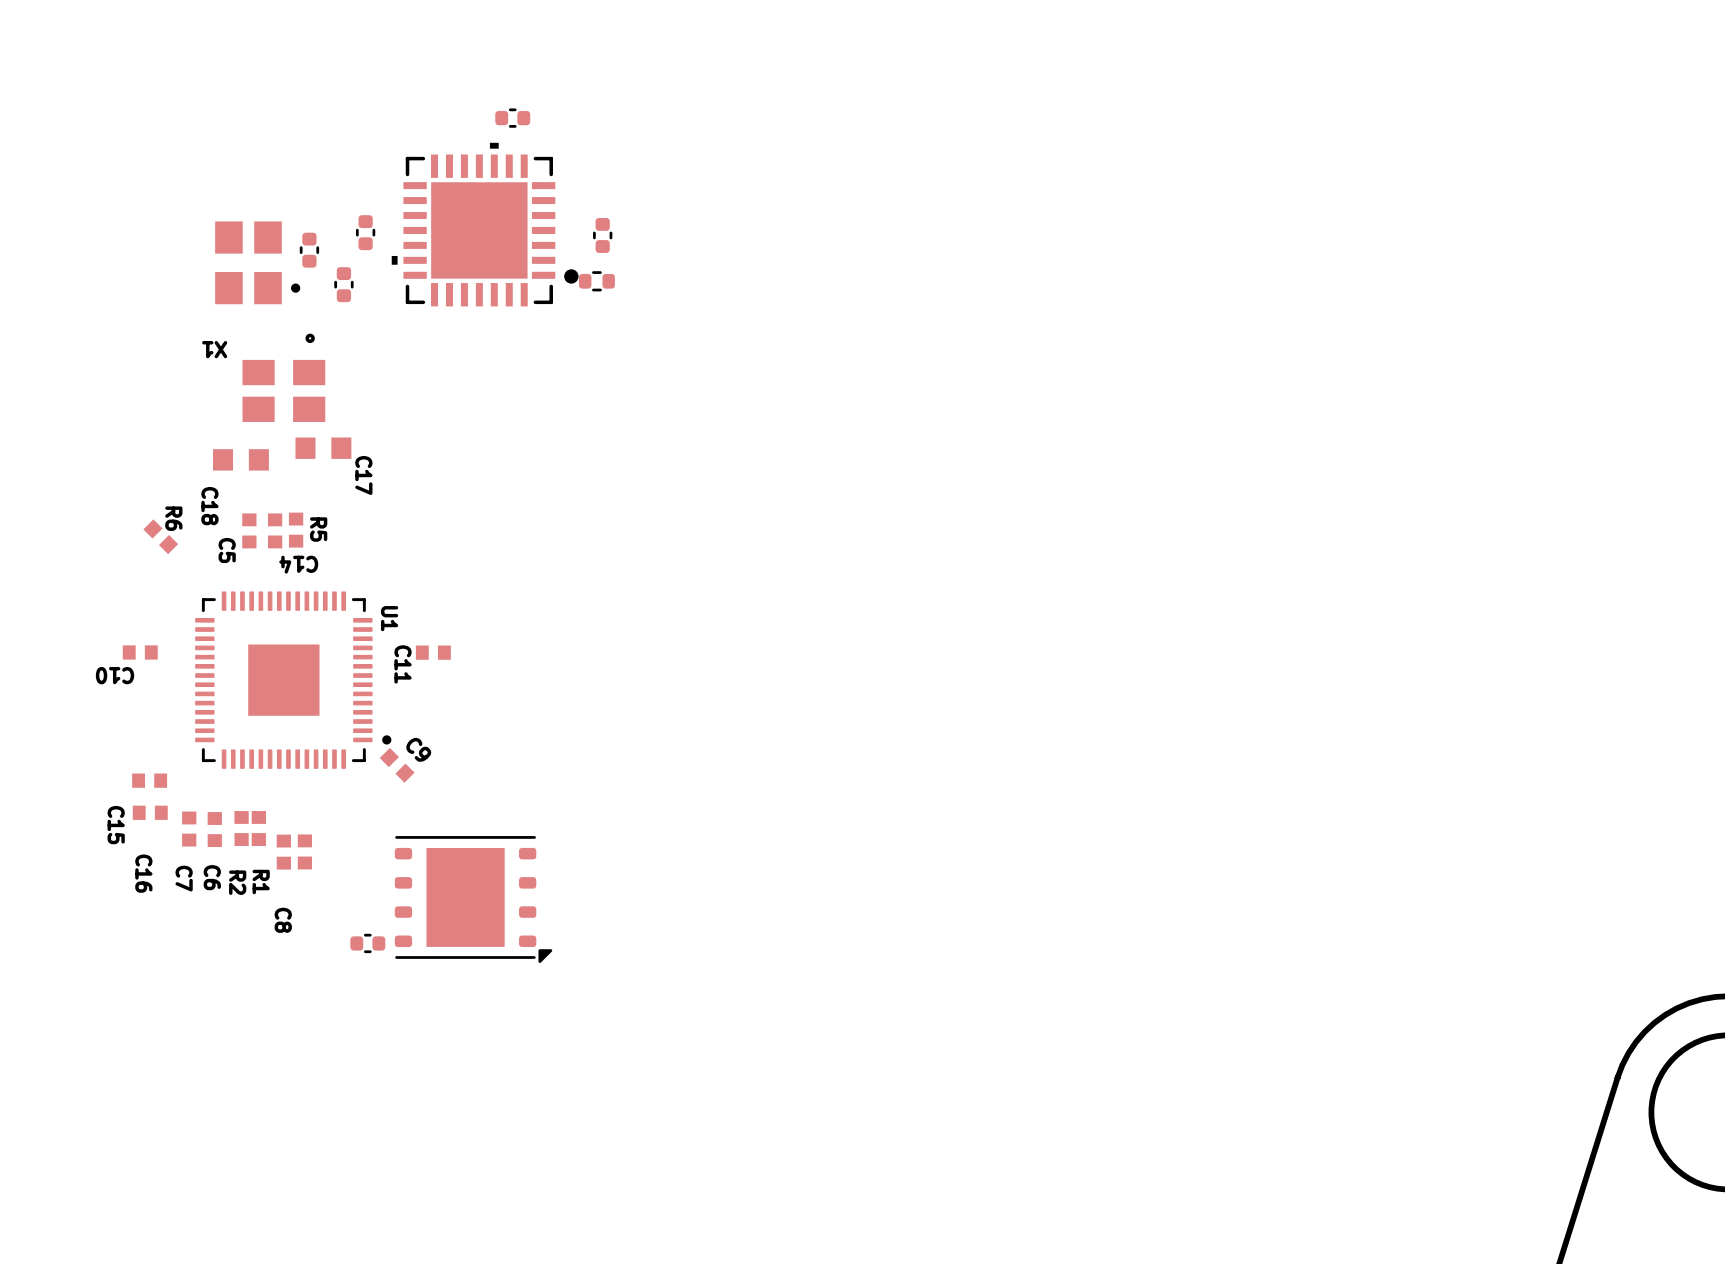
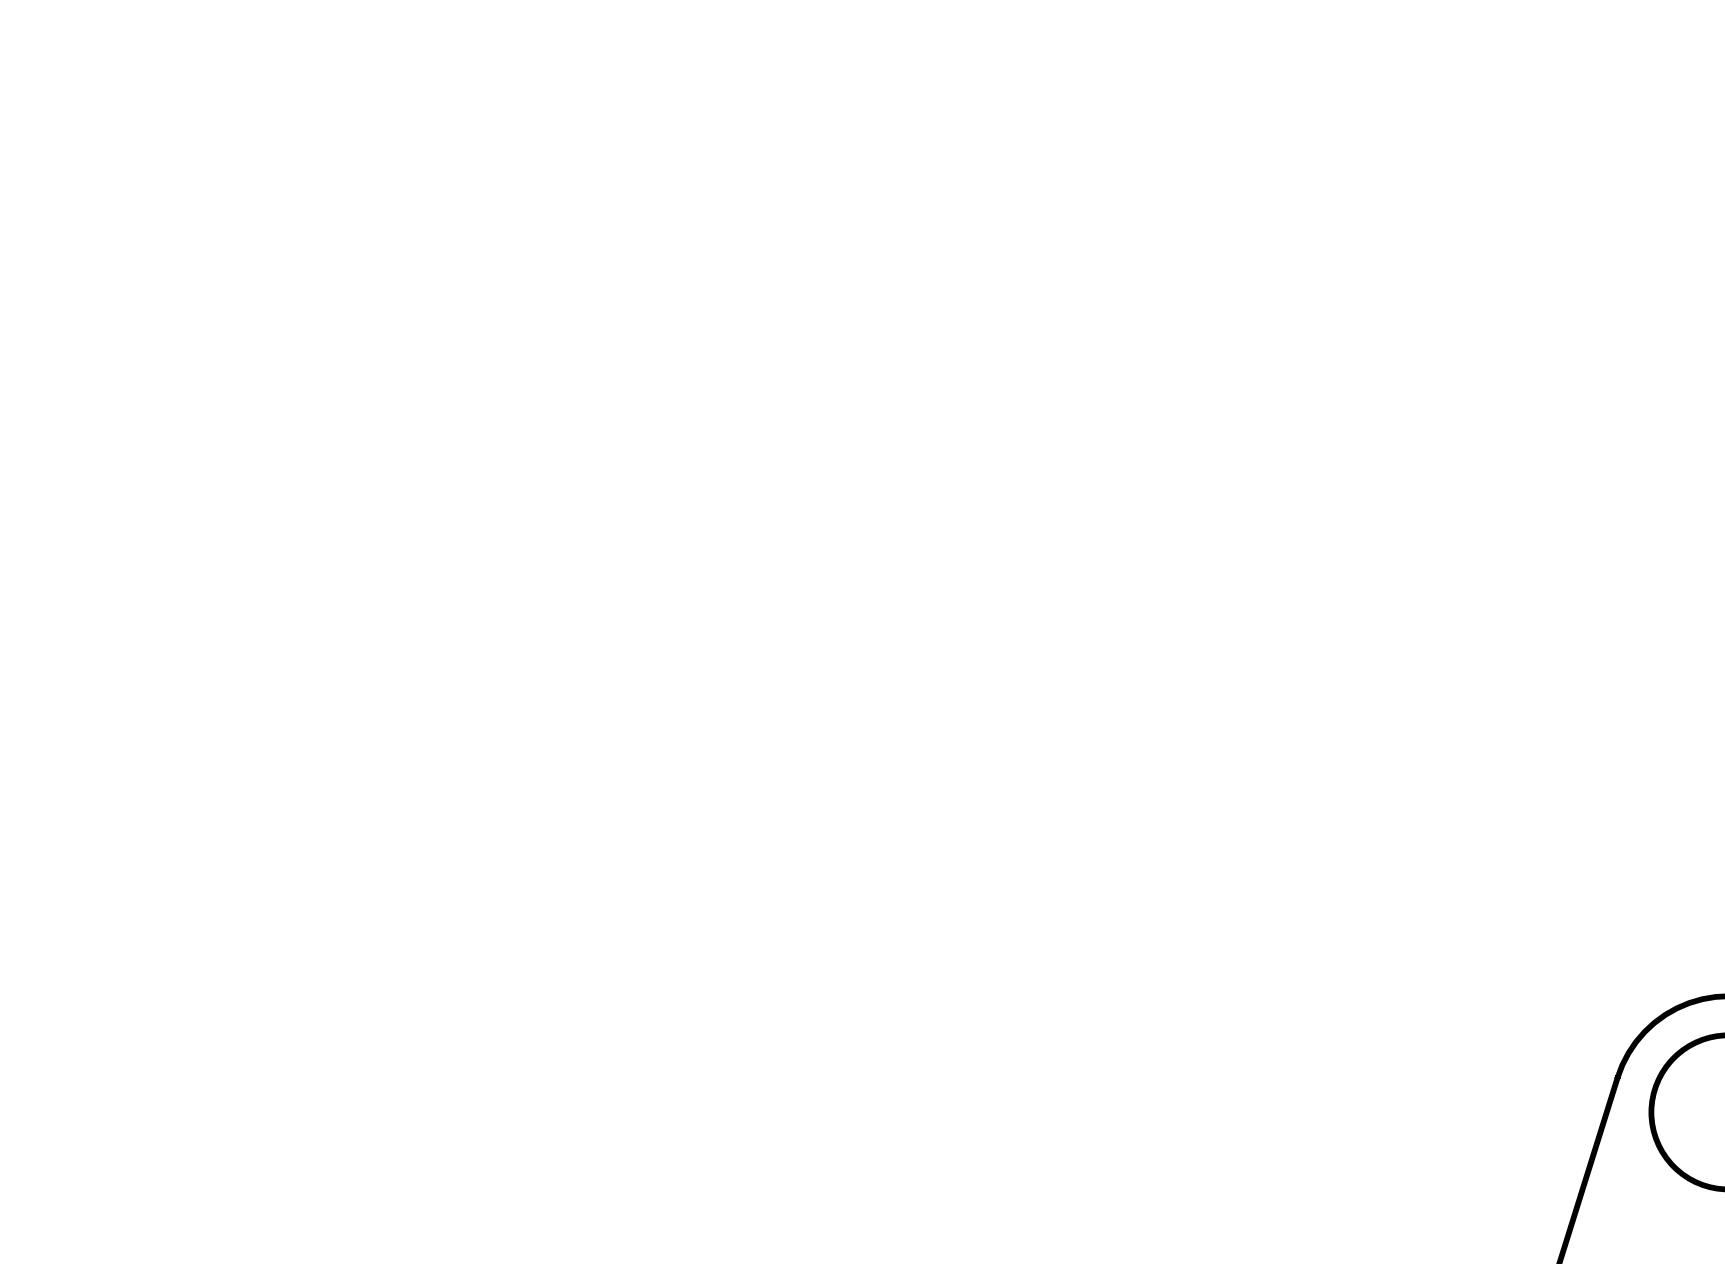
part: (512, 118) -> none
part: (485, 224) -> none
part: (365, 232) -> none
part: (602, 235) -> none
part: (309, 250) -> none
part: (257, 262) -> none
part: (596, 281) -> none
part: (343, 284) -> none
X1: (283, 377) -> none
C17: (323, 448) -> none
C18: (240, 459) -> none
C5: (249, 530) -> none
C14: (275, 530) -> none
R5: (296, 530) -> none
R6: (160, 536) -> none
C10: (140, 652) -> none
C11: (433, 652) -> none
U1: (293, 680) -> none
C9: (397, 765) -> none
C15: (149, 780) -> none
C16: (150, 812) -> none
R2: (241, 828) -> none
R1: (258, 828) -> none
C7: (189, 829) -> none
C6: (214, 829) -> none
part: (304, 851) -> none
C8: (283, 852) -> none
part: (473, 899) -> none
part: (367, 943) -> none

